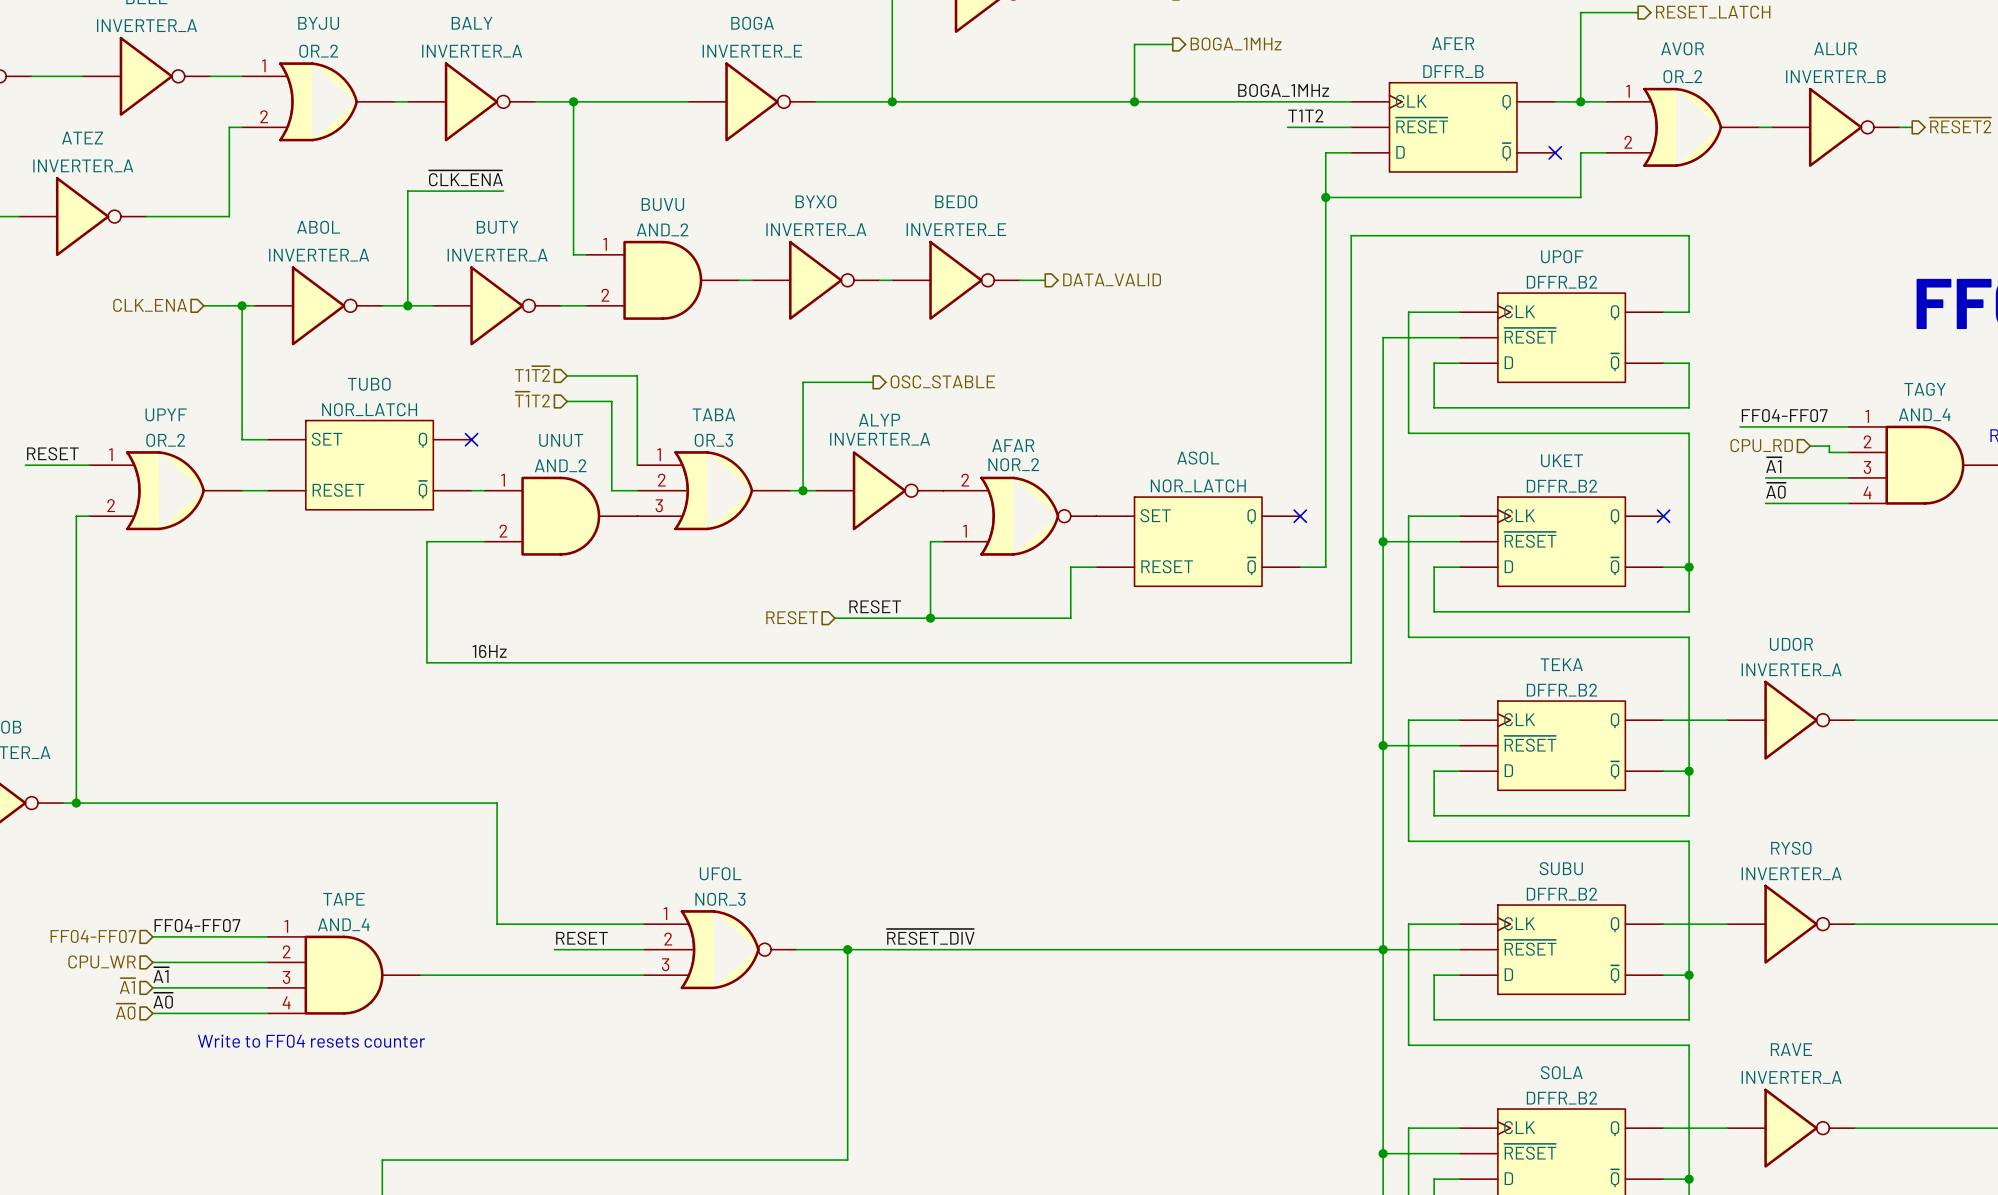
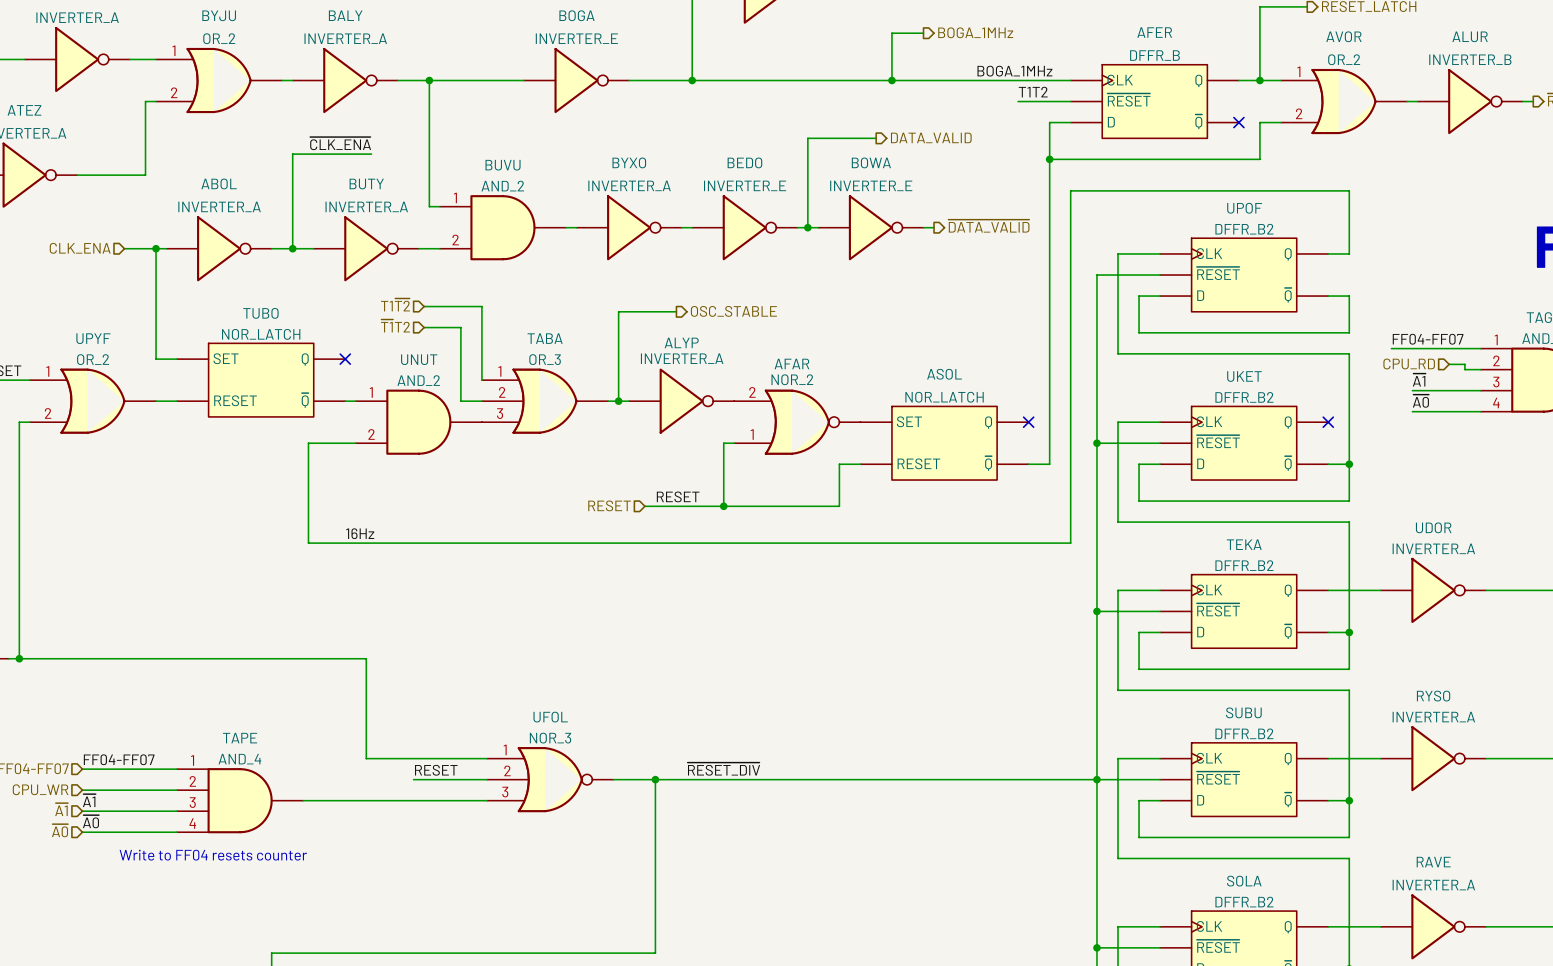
wire: none -> (876, 138) (807, 138) (807, 227)
hierarchical label: none -> ~{DATA_VALID} (988, 226)
hierarchical label position: DATA_VALID (1112, 279) -> DATA_VALID (931, 137)
junction: none -> (807, 227)
BOWA: none -> INVERTER_E (870, 227)
wire: none -> (923, 227) (934, 227)

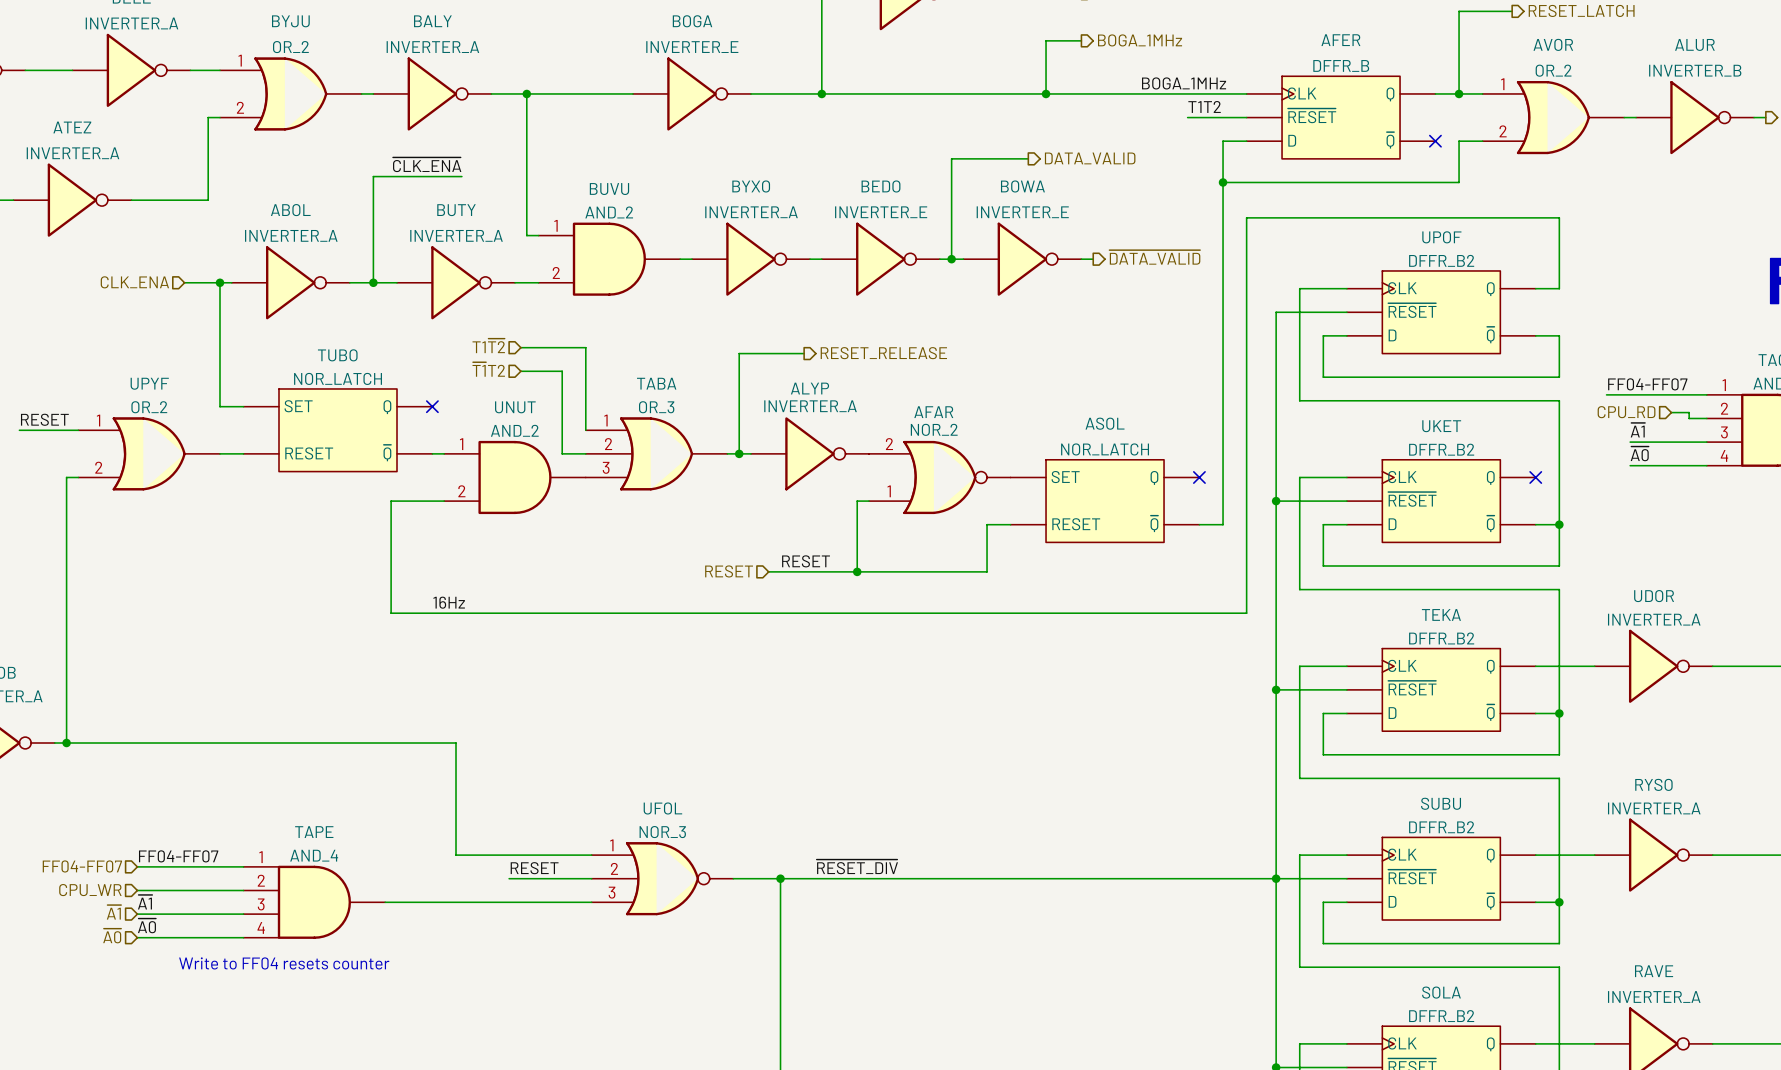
hierarchical label: OSC_STABLE (733, 311) -> RESET_RELEASE (883, 353)

